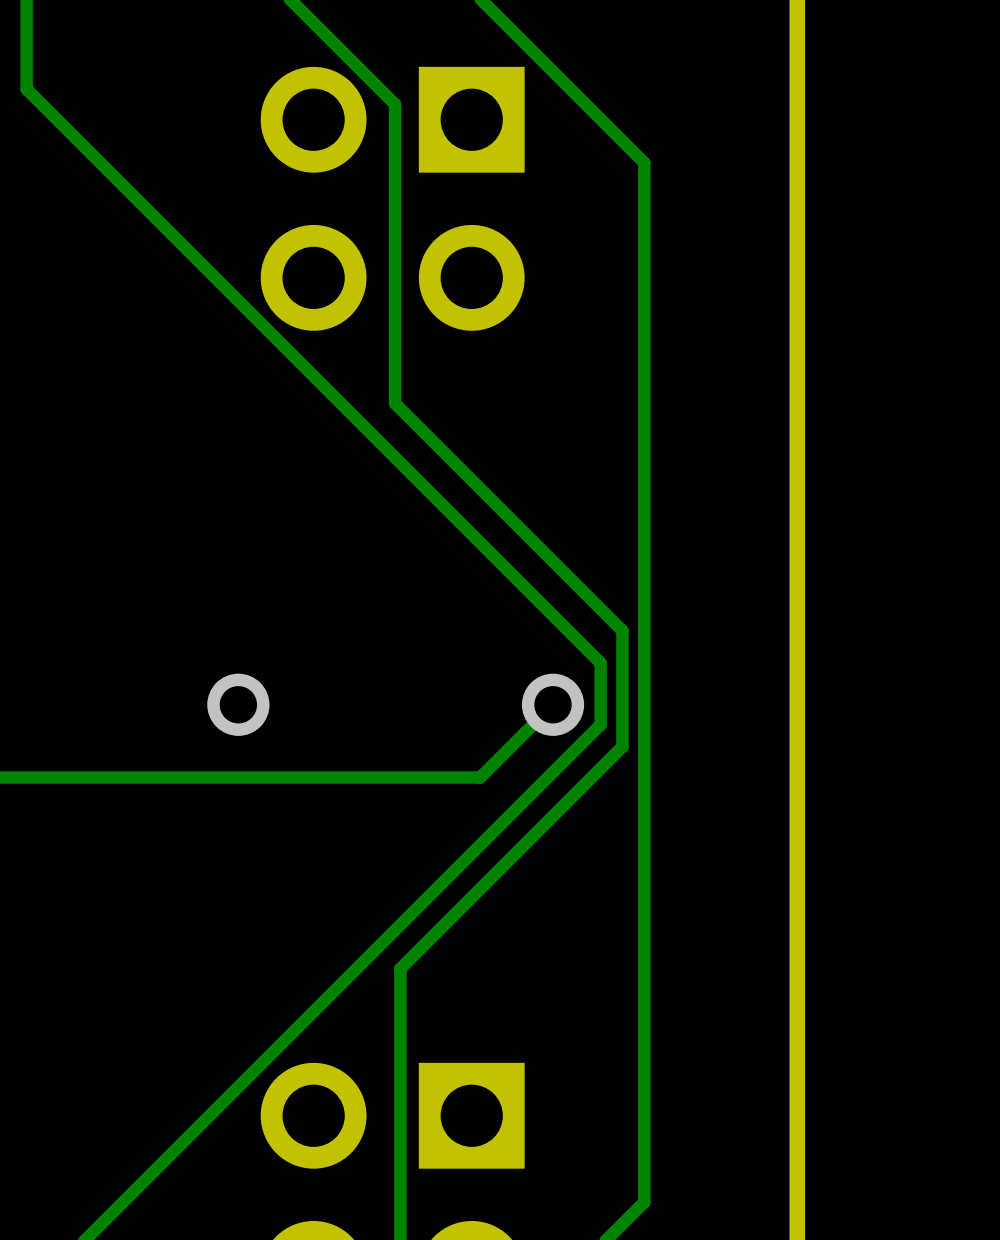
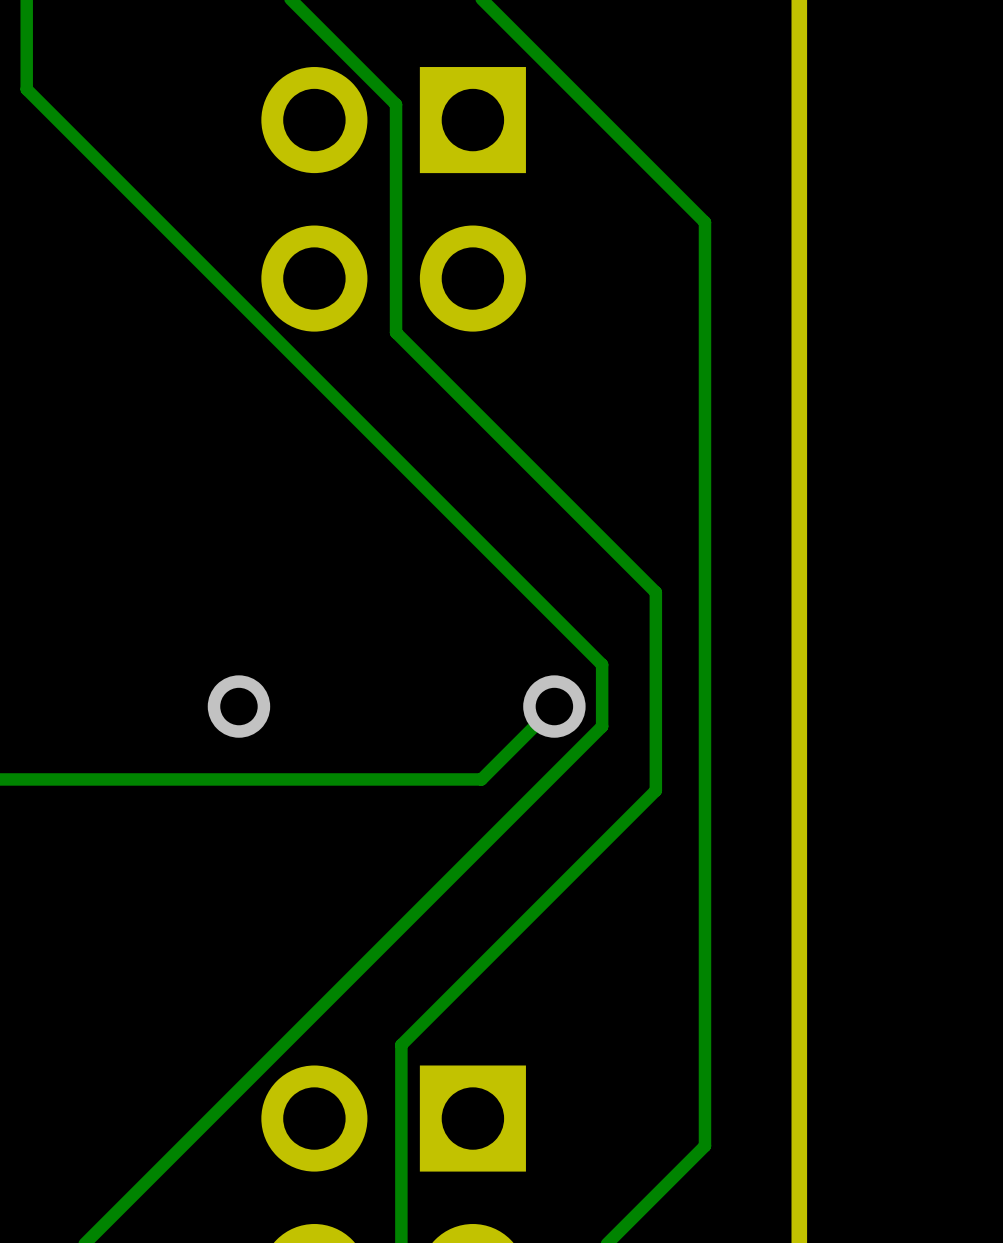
track: (644, 162) (644, 1202) -> (645, 163) (704, 222) (704, 1145) (645, 1205)
track: (395, 331) (395, 403) (622, 630) (622, 746) (400, 968) (400, 1042) -> (396, 332) (655, 592) (655, 790) (401, 1045)

